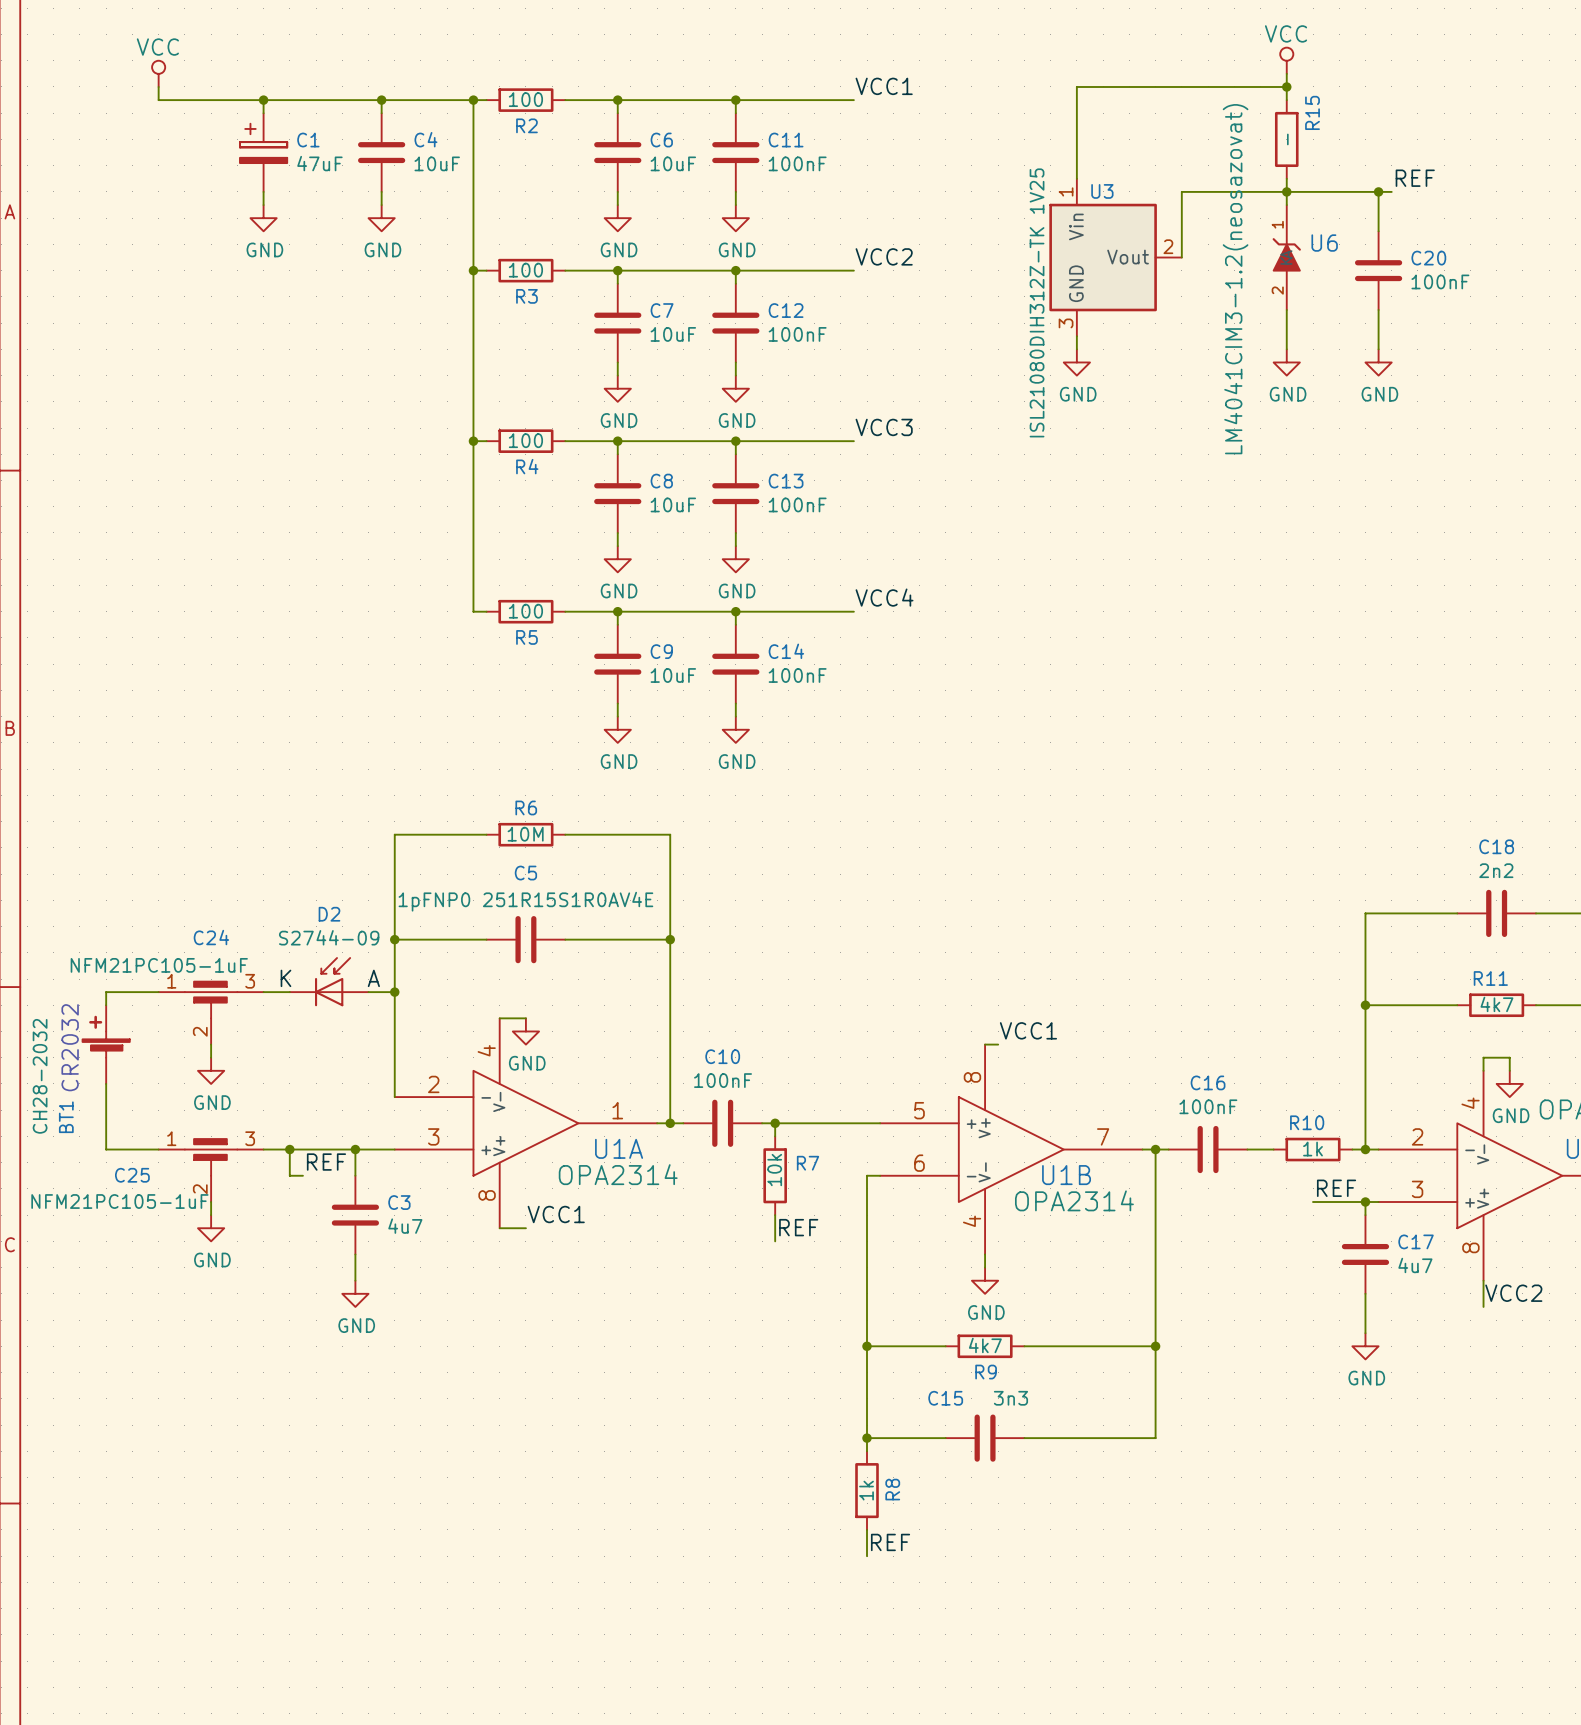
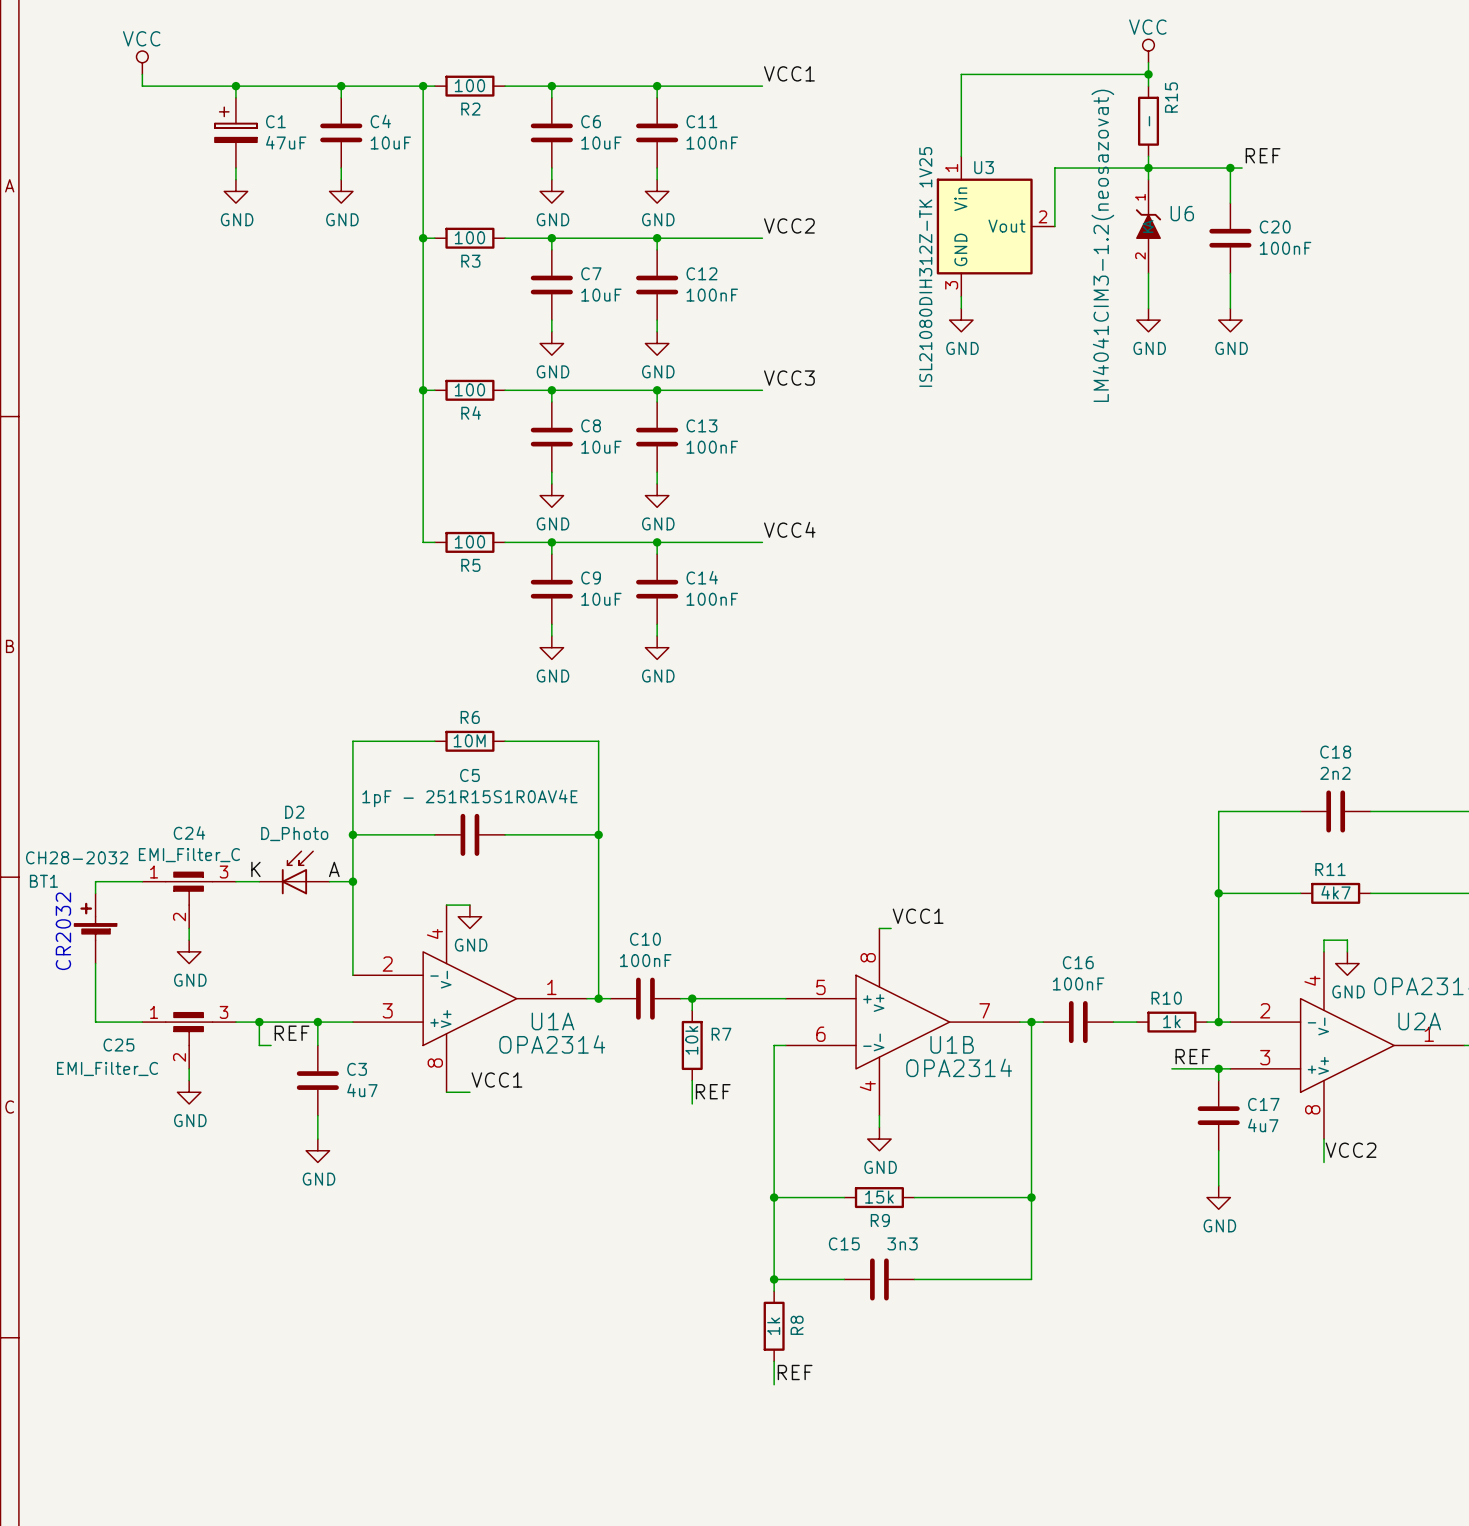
C5 value: 1pFNP0 251R15S1R0AV4E (525, 901) -> 1pF - 251R15S1R0AV4E (469, 798)
D2 value: S2744-09 (329, 937) -> D_Photo (294, 834)
C24 value: NFM21PC105-1uF (159, 965) -> EMI_Filter_C (189, 855)
BT1 value rotation: 0° (40, 1076) -> 90° clockwise (77, 857)
BT1 name rotation: 0° (66, 1117) -> 90° clockwise (43, 881)
BT1 name position: BT1 (66, 1117) -> BT1 (43, 881)
C25 value: NFM21PC105-1uF (119, 1201) -> EMI_Filter_C (107, 1068)
R9 value: 4k7 (985, 1345) -> 15k (879, 1197)

